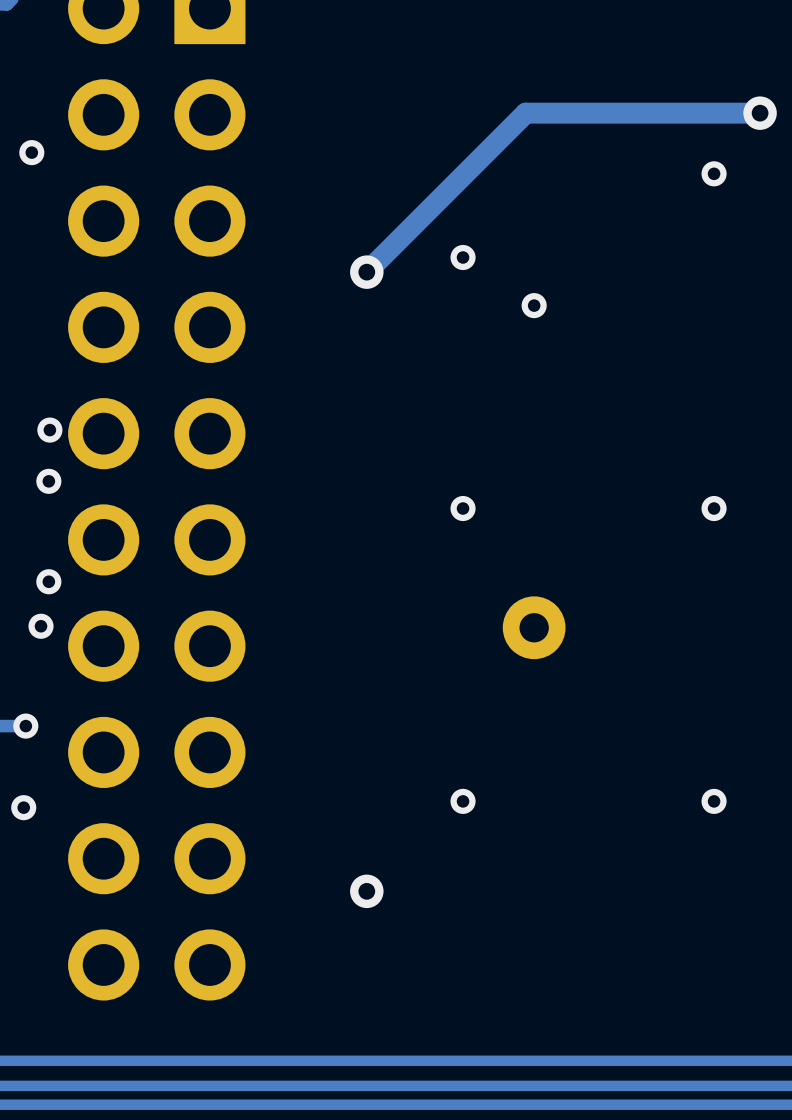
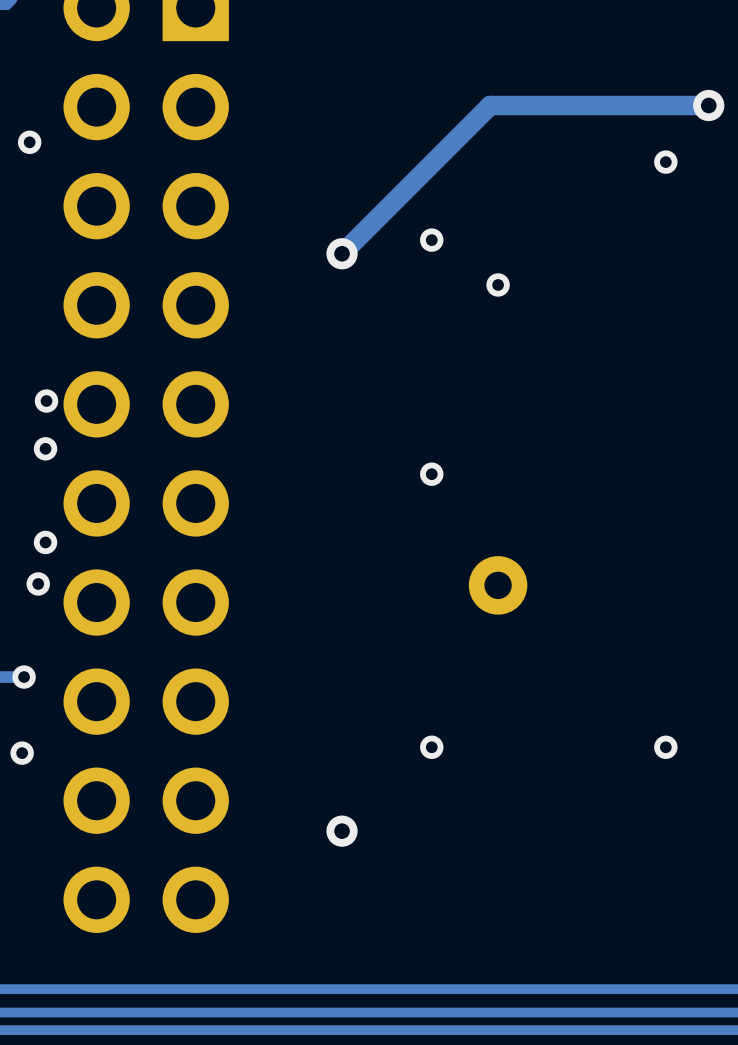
via: (714, 508) -> none

